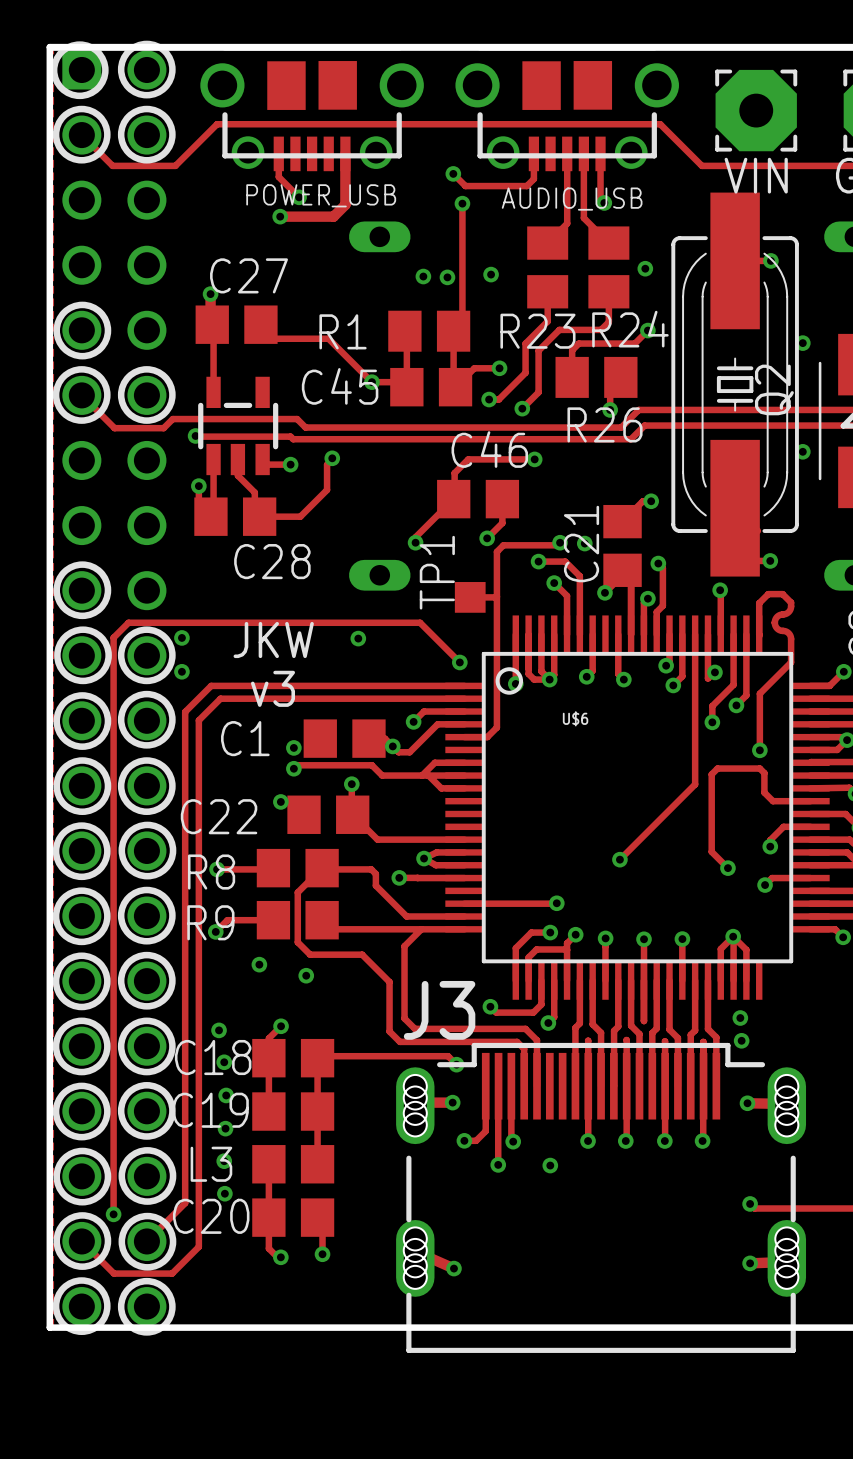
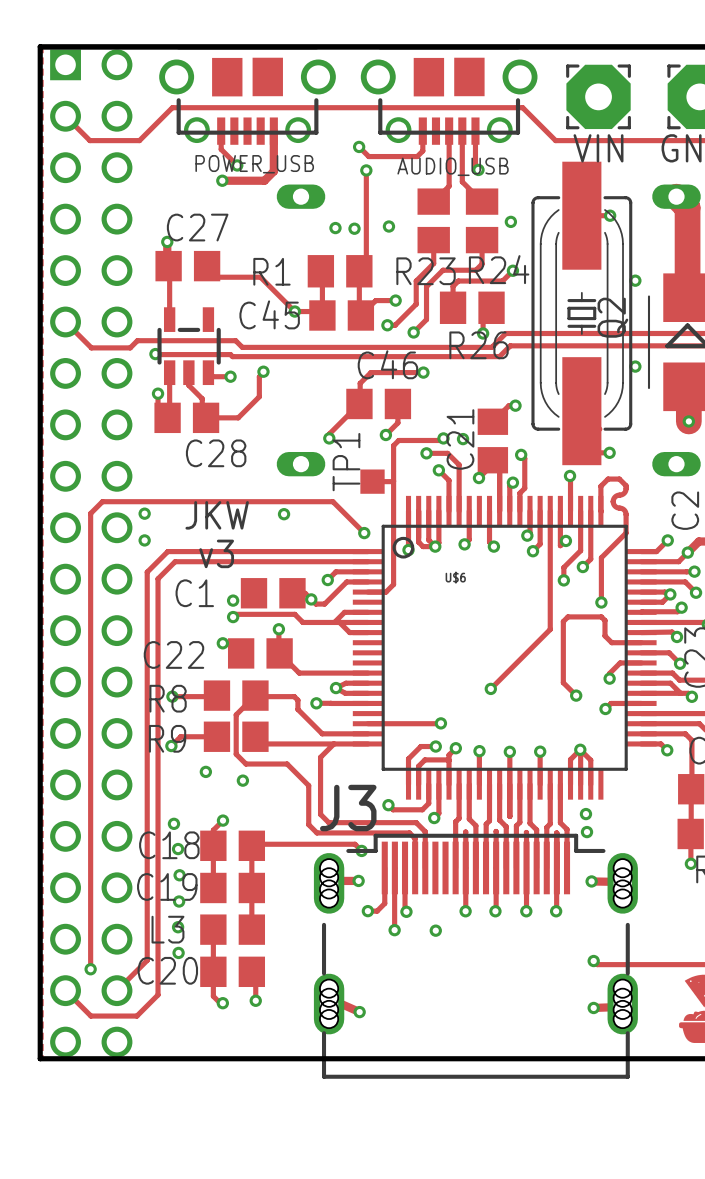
drawing: [50, 40, 176, 164] -> none
drawing: [52, 301, 176, 424] -> none
drawing: [52, 561, 177, 1336] -> none

